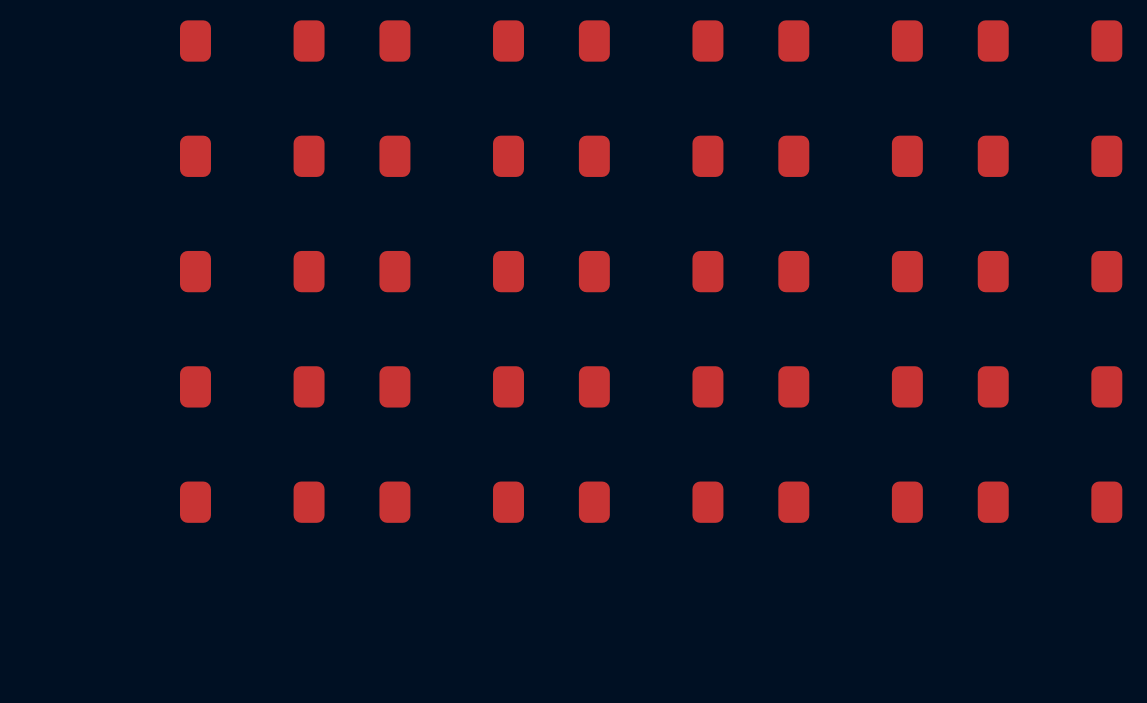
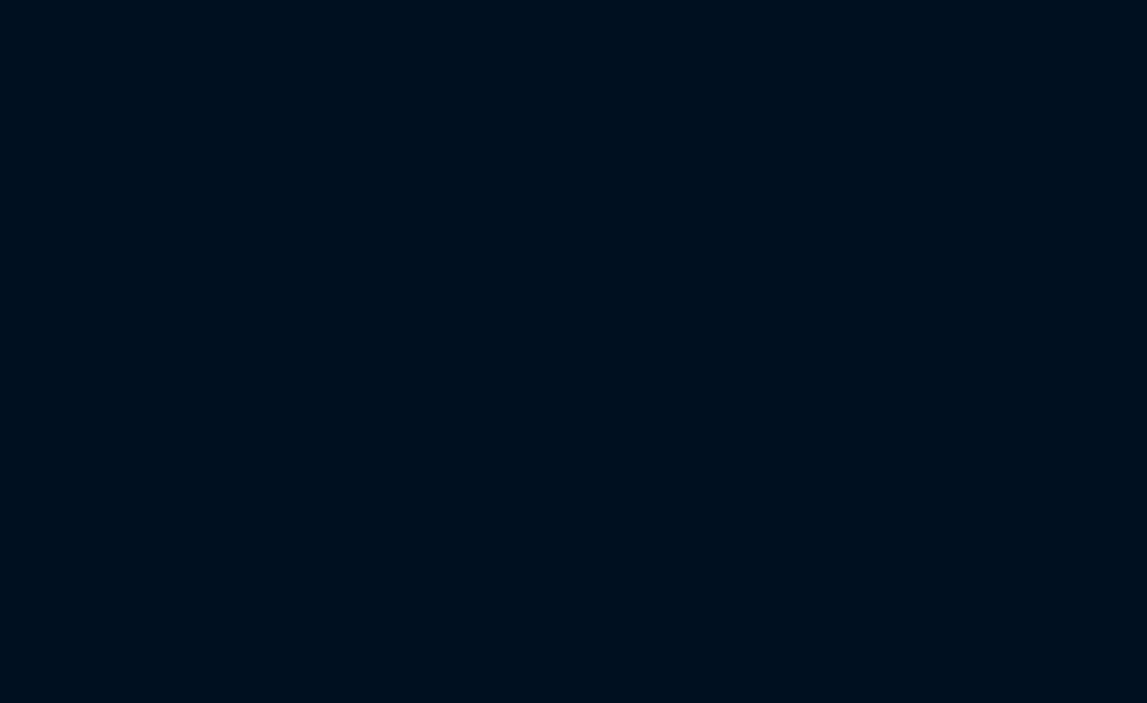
part: (252, 41) -> none
part: (451, 41) -> none
part: (651, 41) -> none
part: (850, 41) -> none
part: (1050, 41) -> none
part: (252, 156) -> none
part: (451, 156) -> none
part: (651, 156) -> none
part: (850, 156) -> none
part: (1050, 156) -> none
part: (252, 271) -> none
part: (451, 271) -> none
part: (651, 271) -> none
part: (850, 271) -> none
part: (1050, 271) -> none
part: (252, 386) -> none
part: (451, 386) -> none
part: (651, 386) -> none
part: (850, 386) -> none
part: (1050, 386) -> none
part: (252, 502) -> none
part: (451, 502) -> none
part: (651, 502) -> none
part: (850, 502) -> none
part: (1050, 502) -> none

